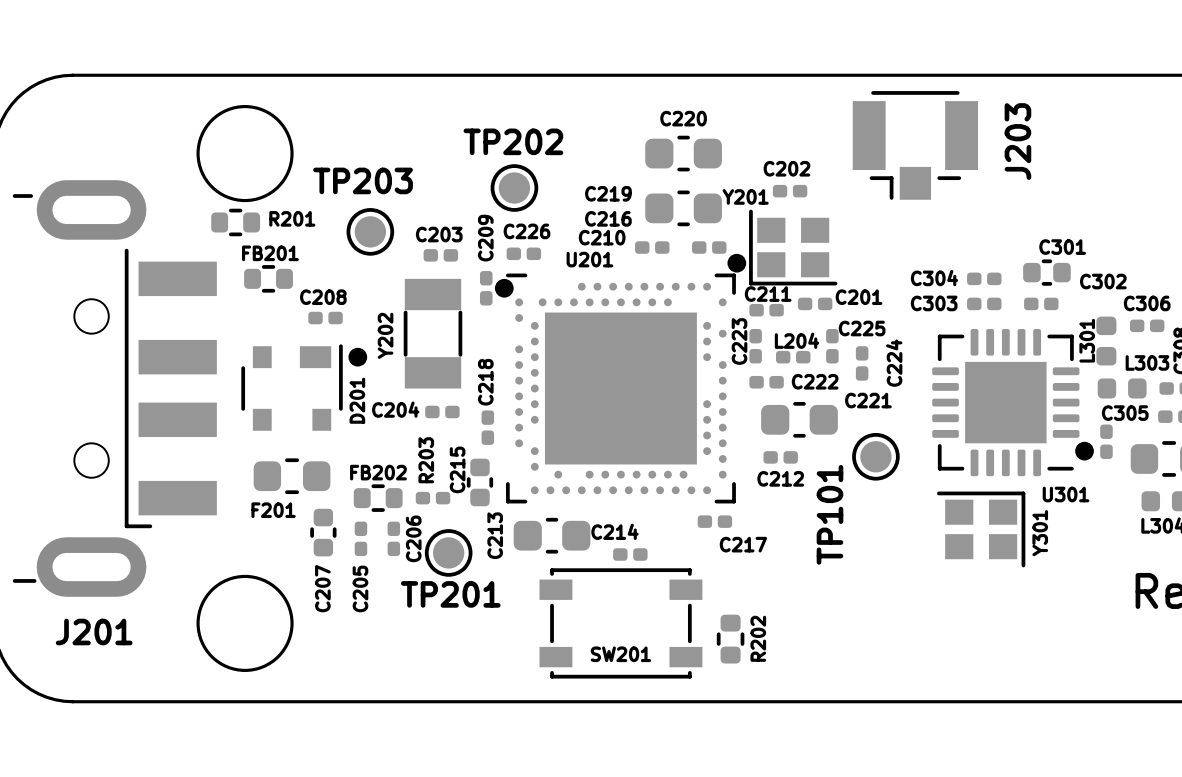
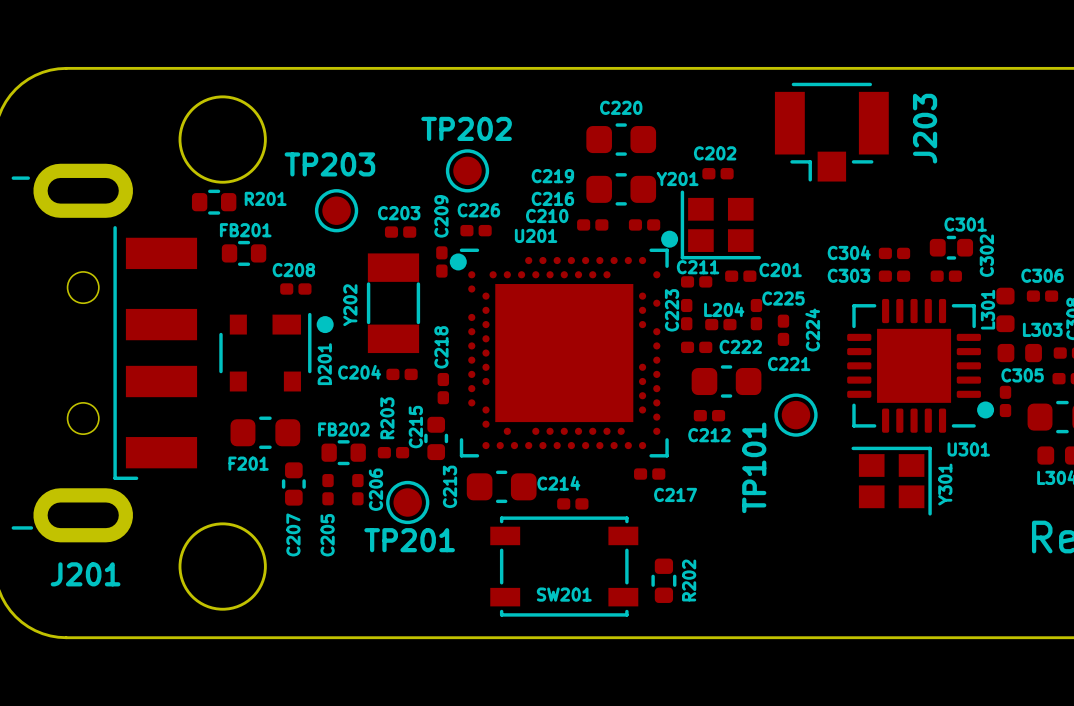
C302 name rotation: 0° (1103, 281) -> 90° counterclockwise (986, 255)

